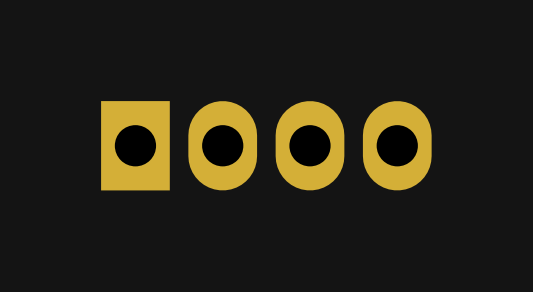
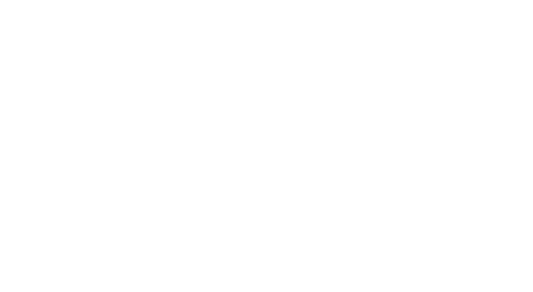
part: (266, 145) -> none

